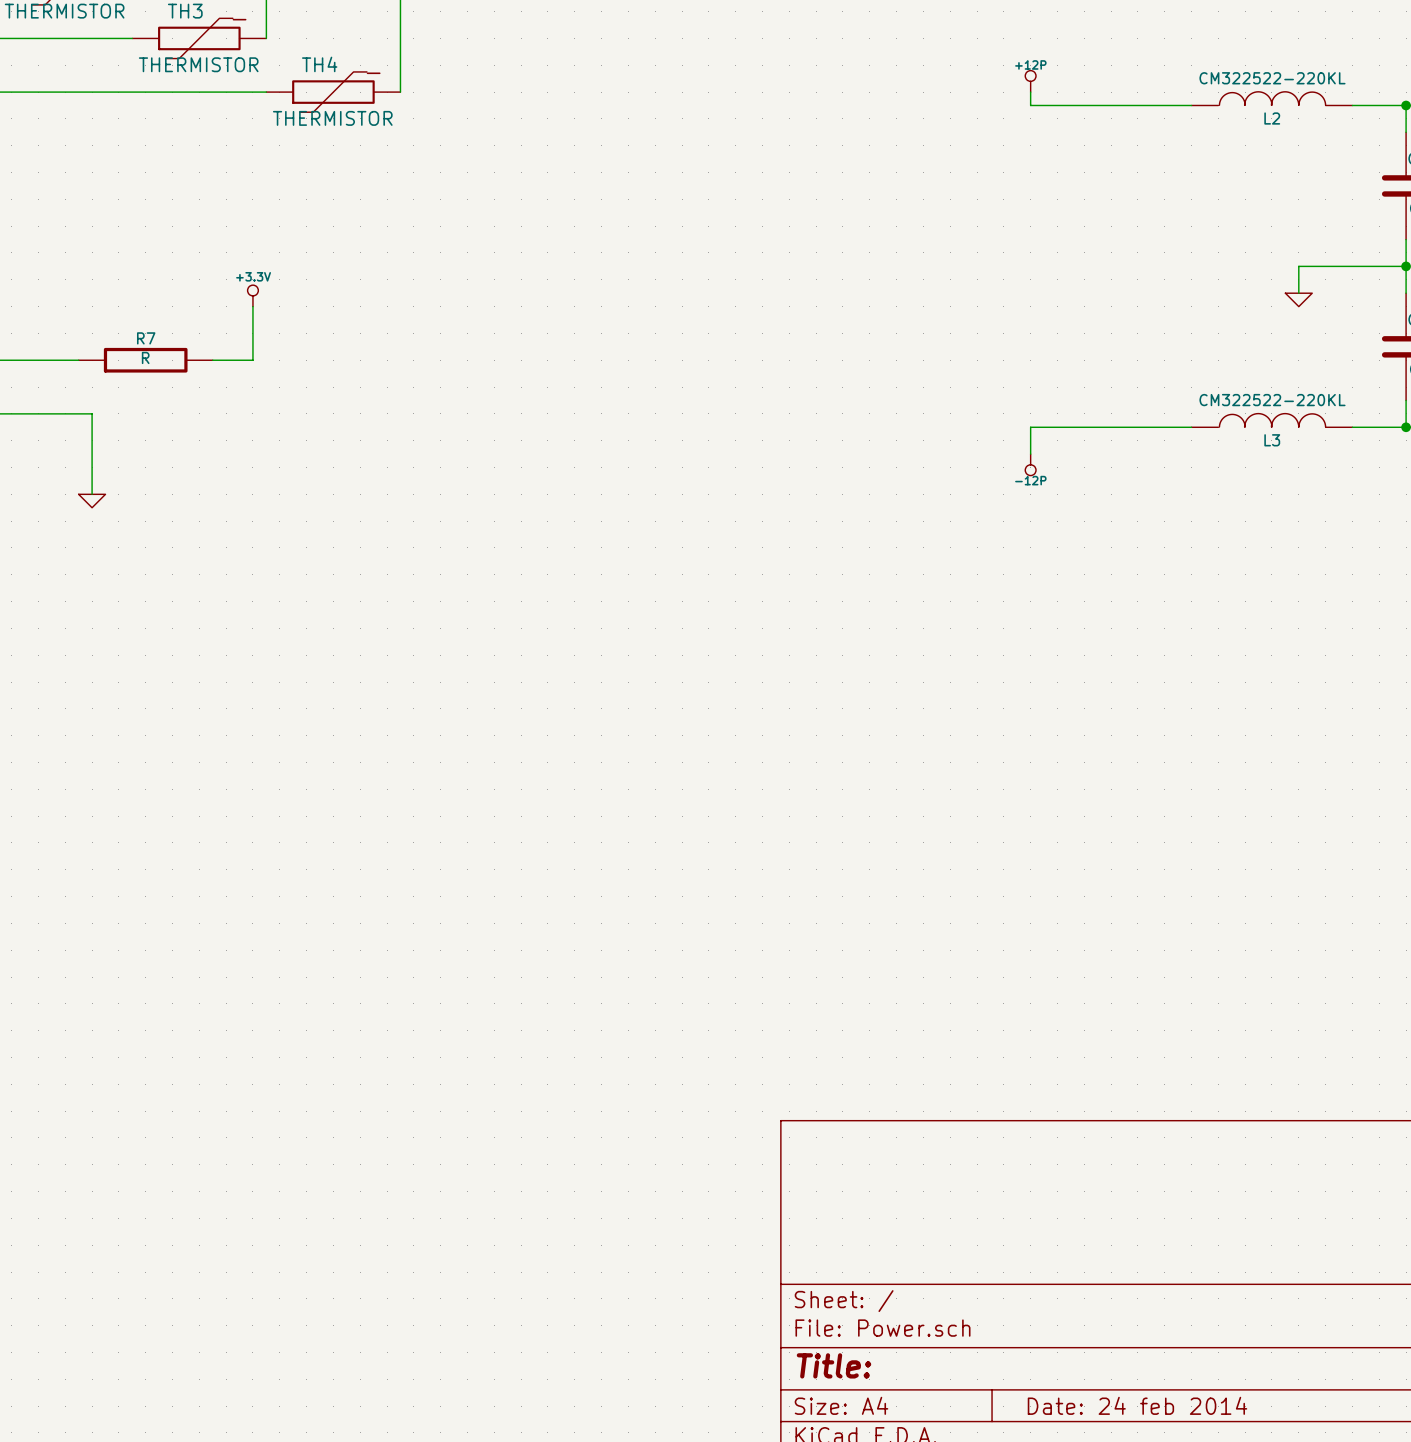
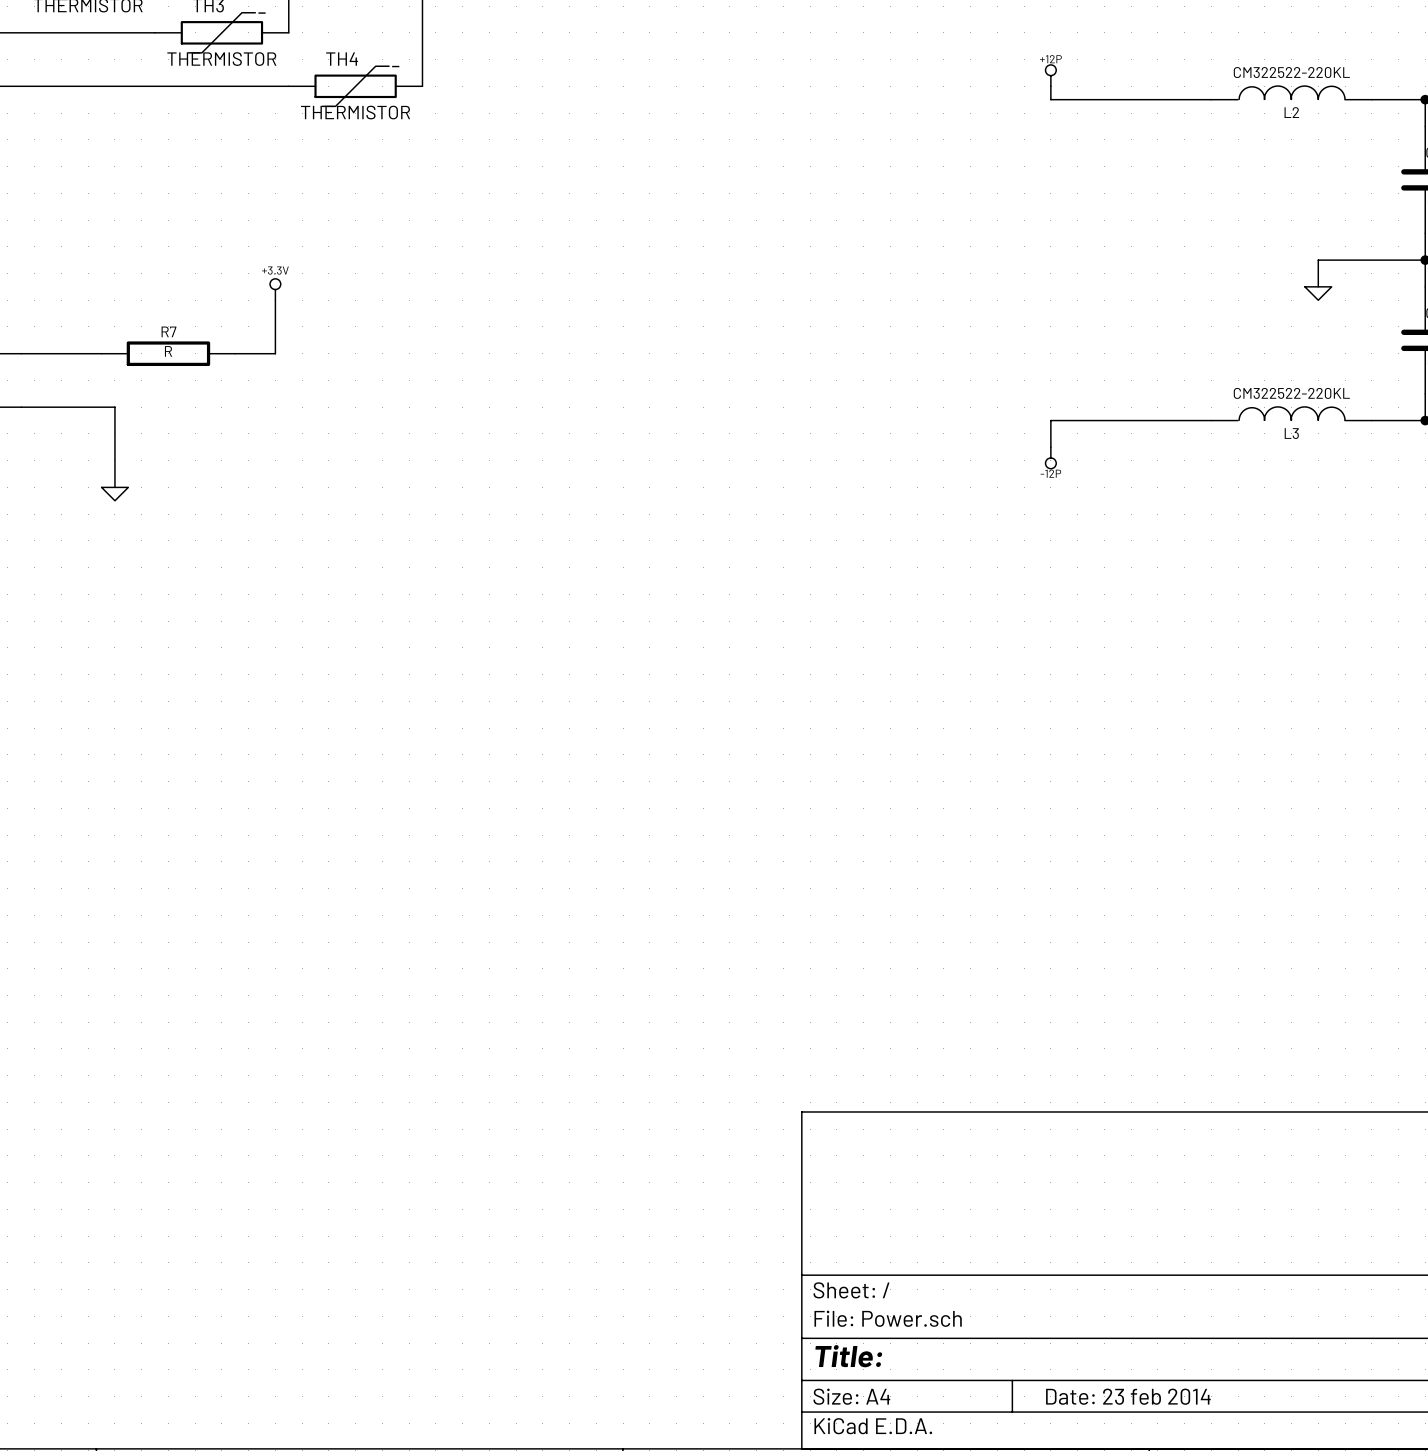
title block: Date: 24 feb 2014 (1137, 1405) -> Date: 23 feb 2014 (1128, 1396)

